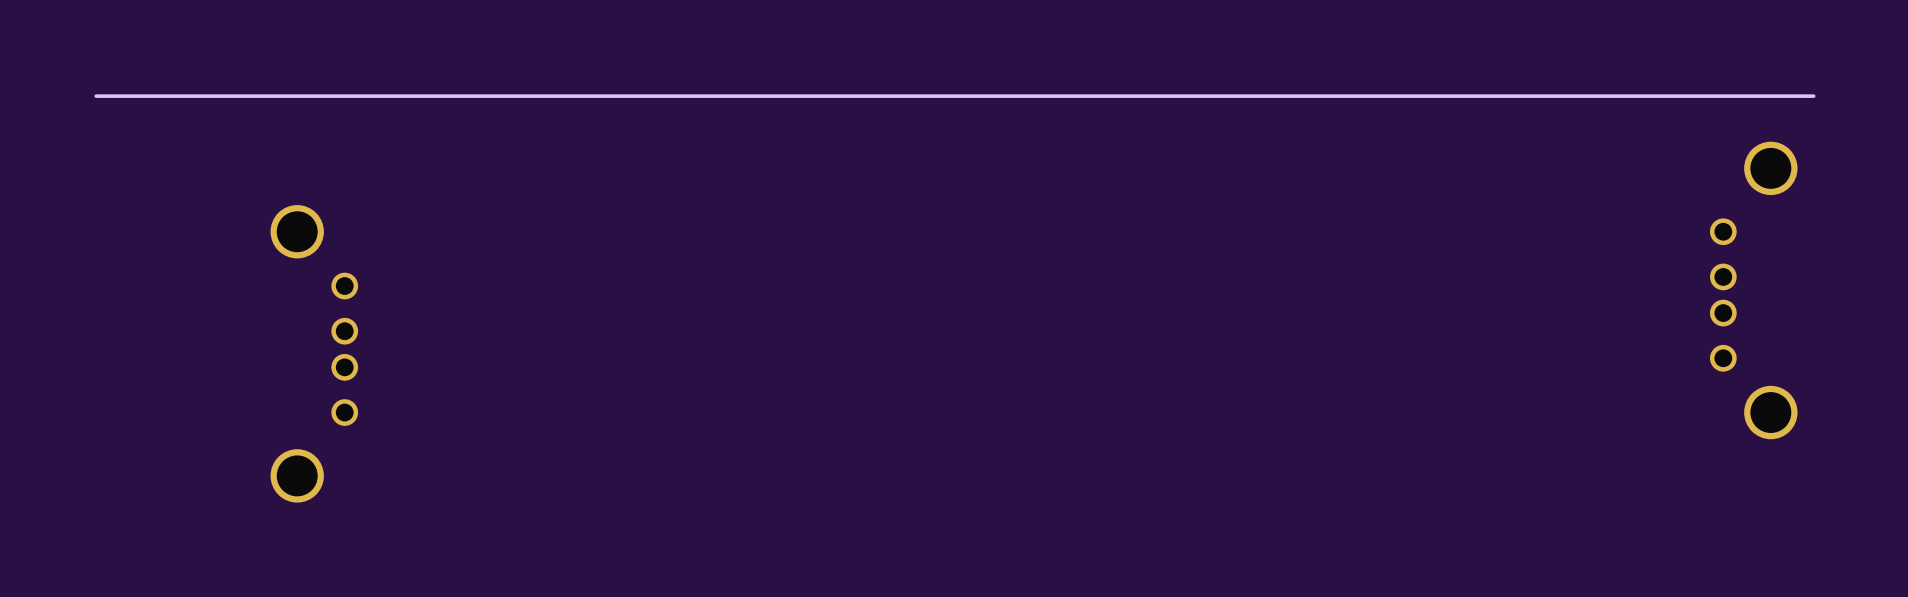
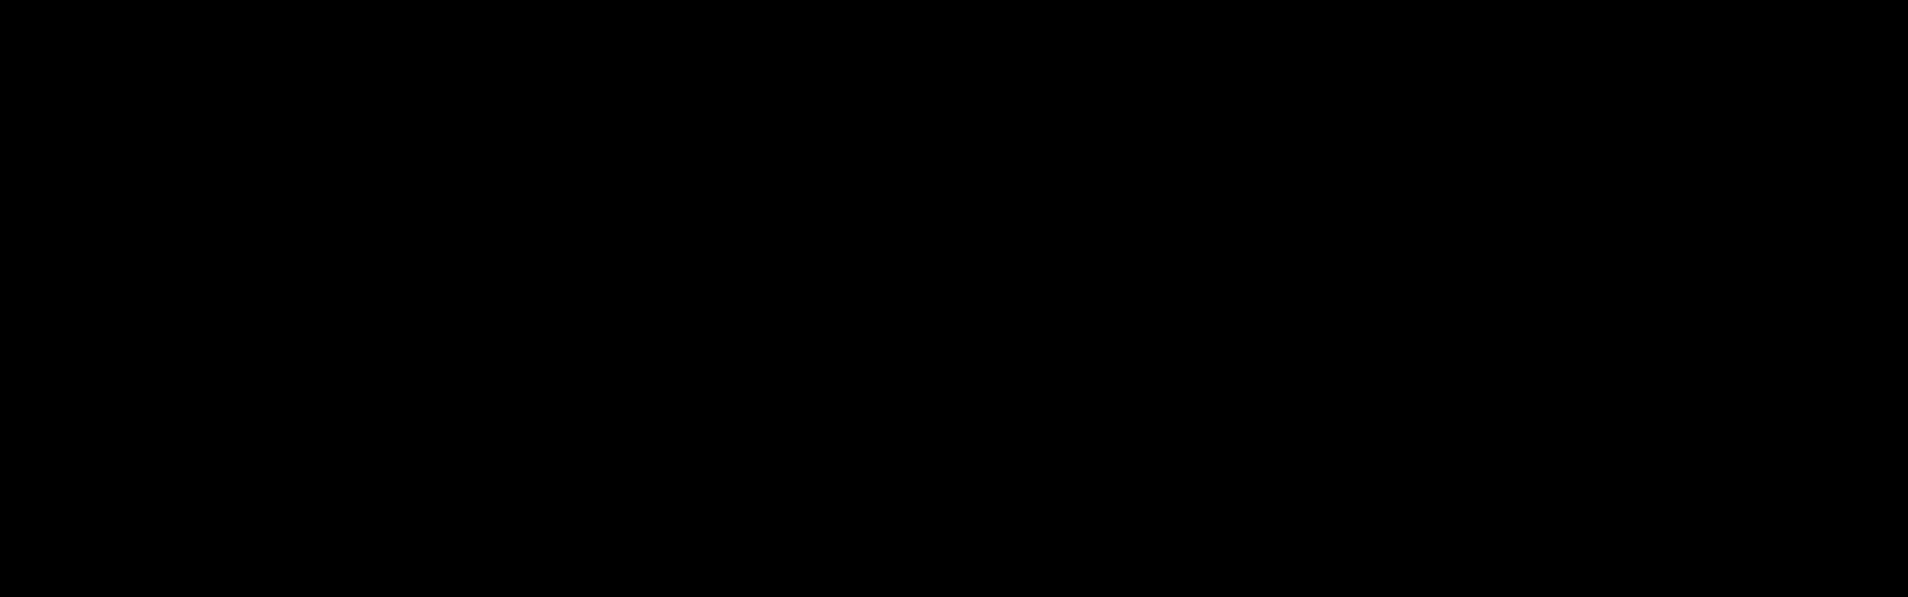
board edge: (1813, 96) (96, 96) -> none
part: (1753, 290) -> none
part: (314, 353) -> none

